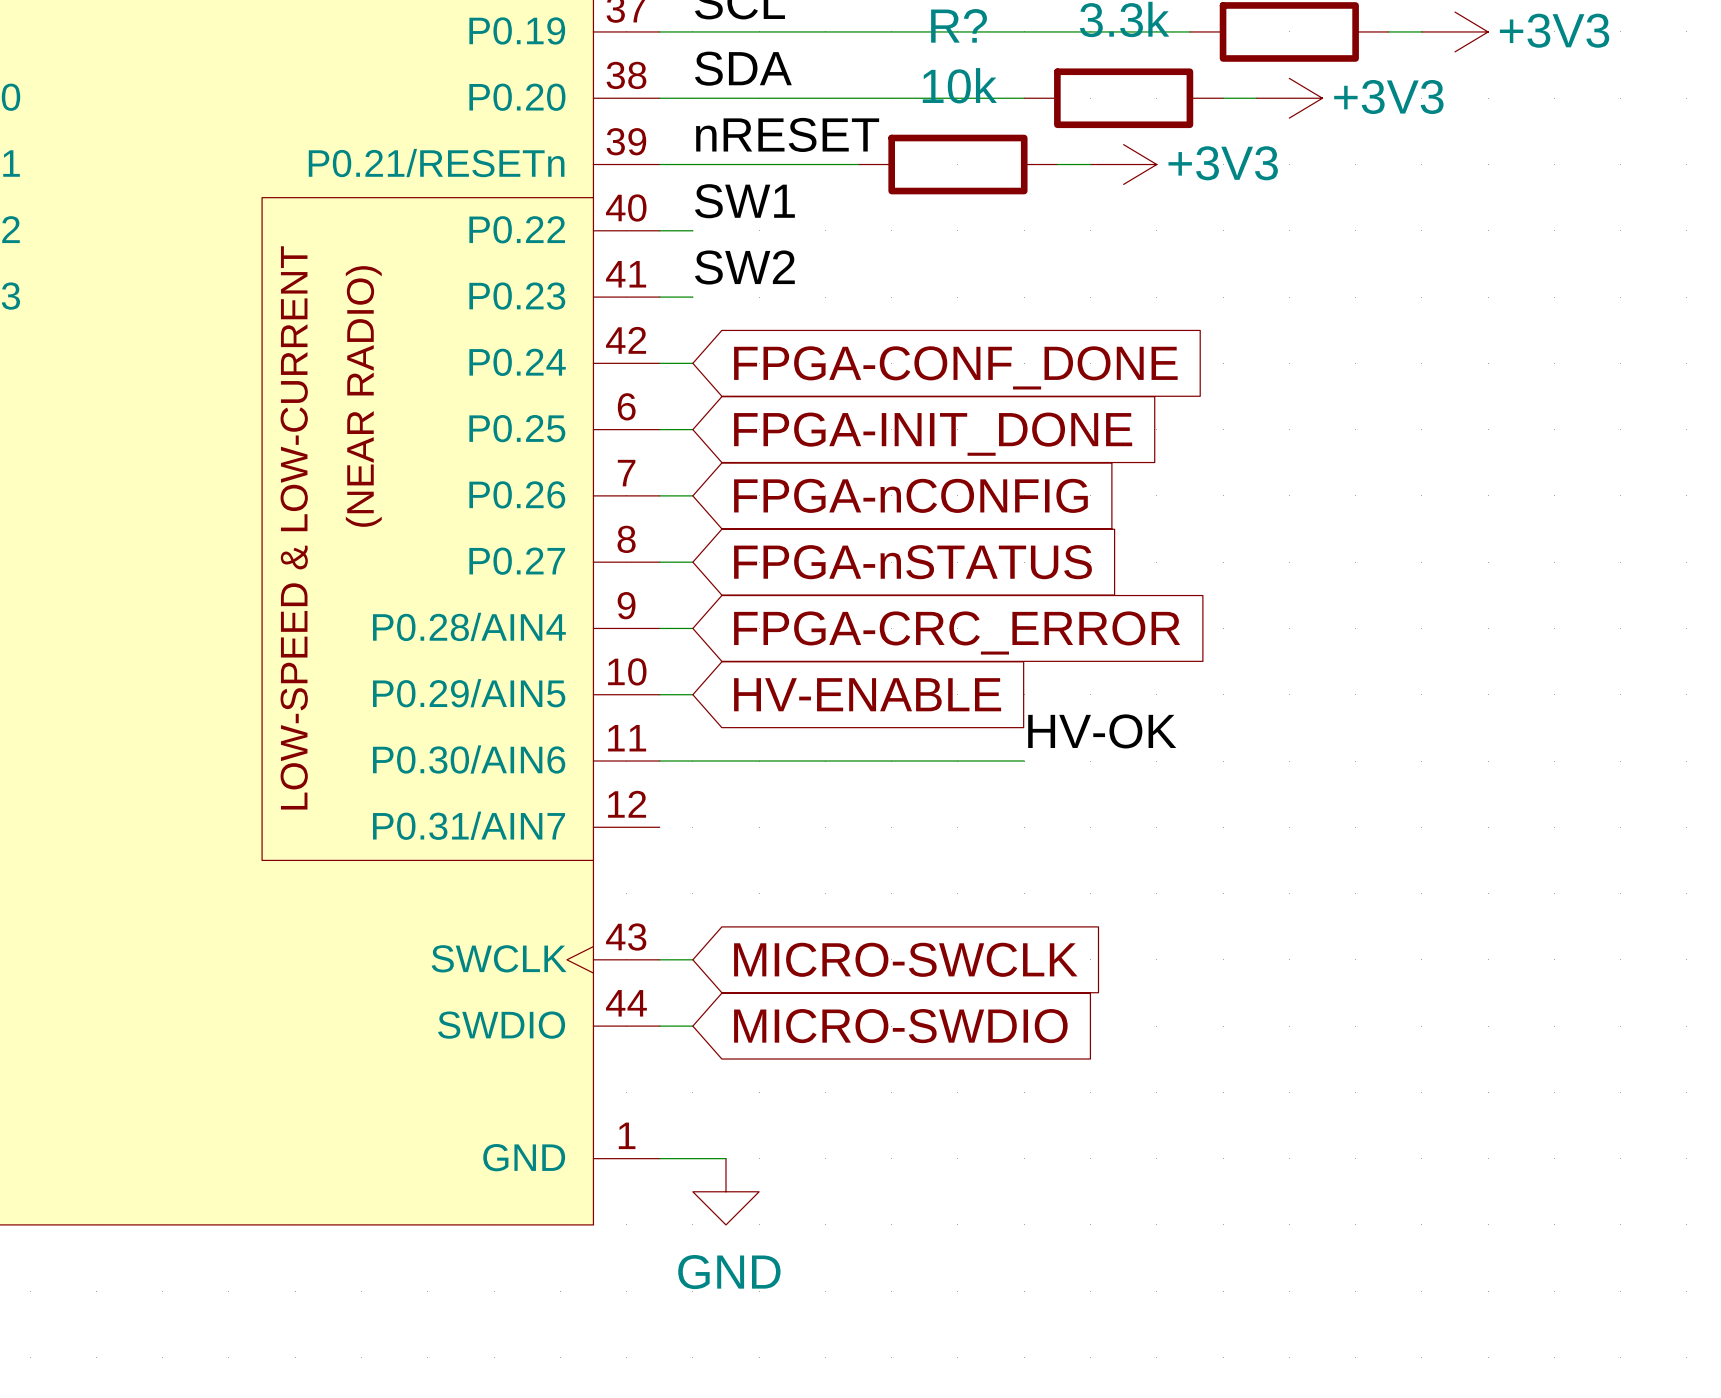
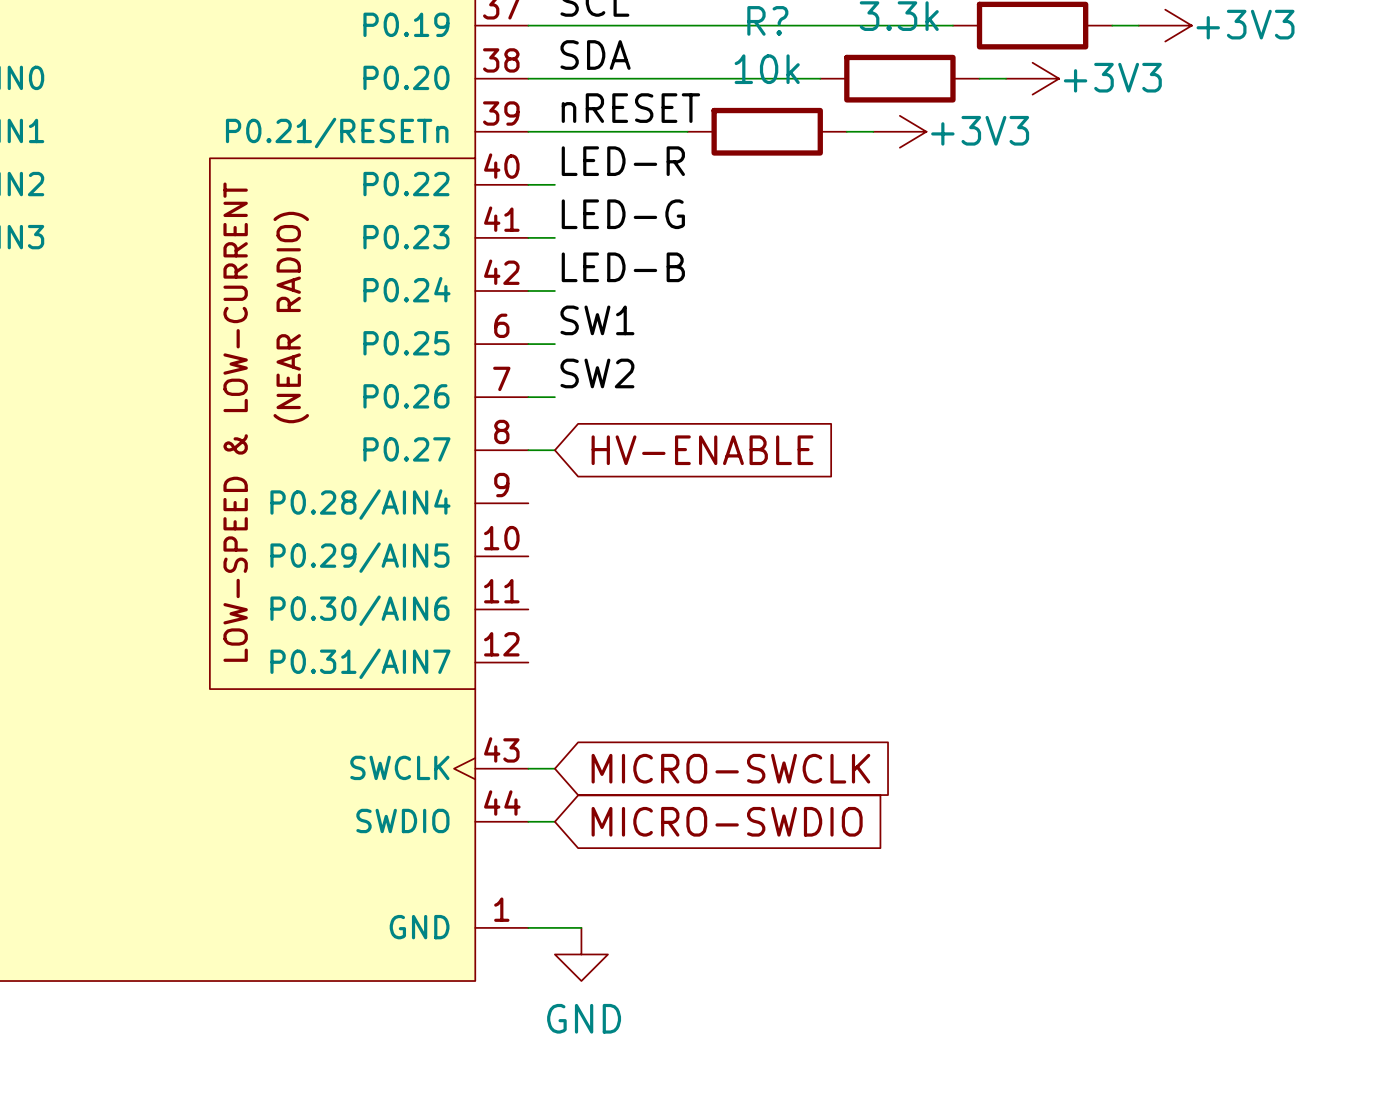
label: SW1 (744, 201) -> LED-R (623, 161)
label: SW2 (744, 267) -> LED-G (623, 214)
label: none -> LED-B (623, 267)
global label: FPGA-CONF_DONE (955, 367) -> none
label: none -> SW1 (597, 320)
global label: FPGA-INIT_DONE (933, 434) -> none
label: none -> SW2 (597, 373)
global label: FPGA-nCONFIG (910, 495) -> none
global label: FPGA-nSTATUS (912, 562) -> HV-ENABLE (702, 450)
wire: (659, 628) (692, 628) -> none
global label: FPGA-CRC_ERROR (957, 632) -> none
wire: (659, 694) (692, 694) -> none
global label: HV-ENABLE (867, 694) -> none
label: HV-OK (1102, 731) -> none
wire: (659, 761) (1024, 761) -> none

